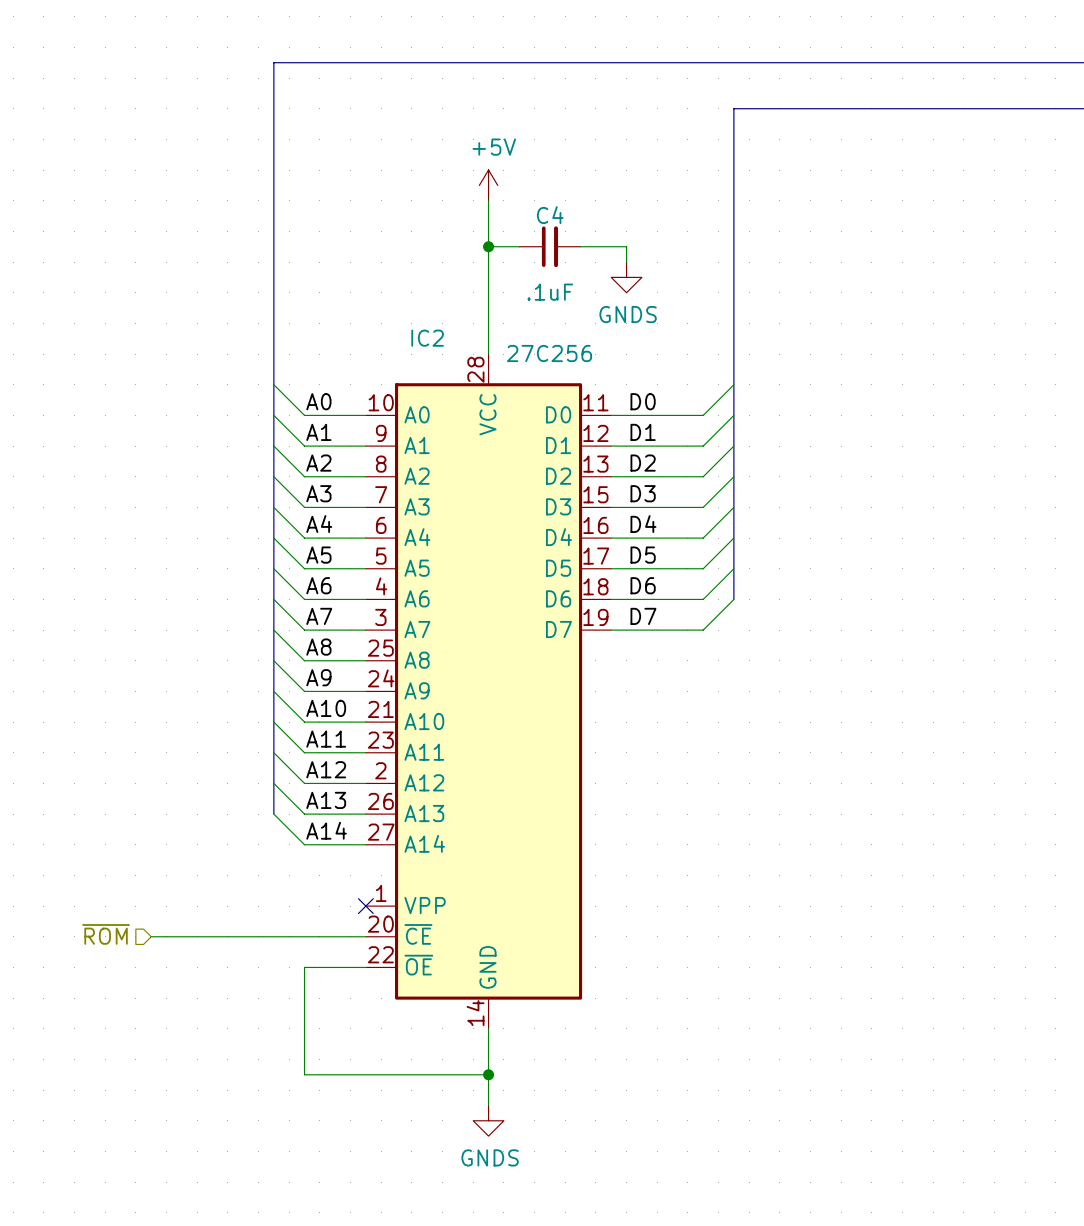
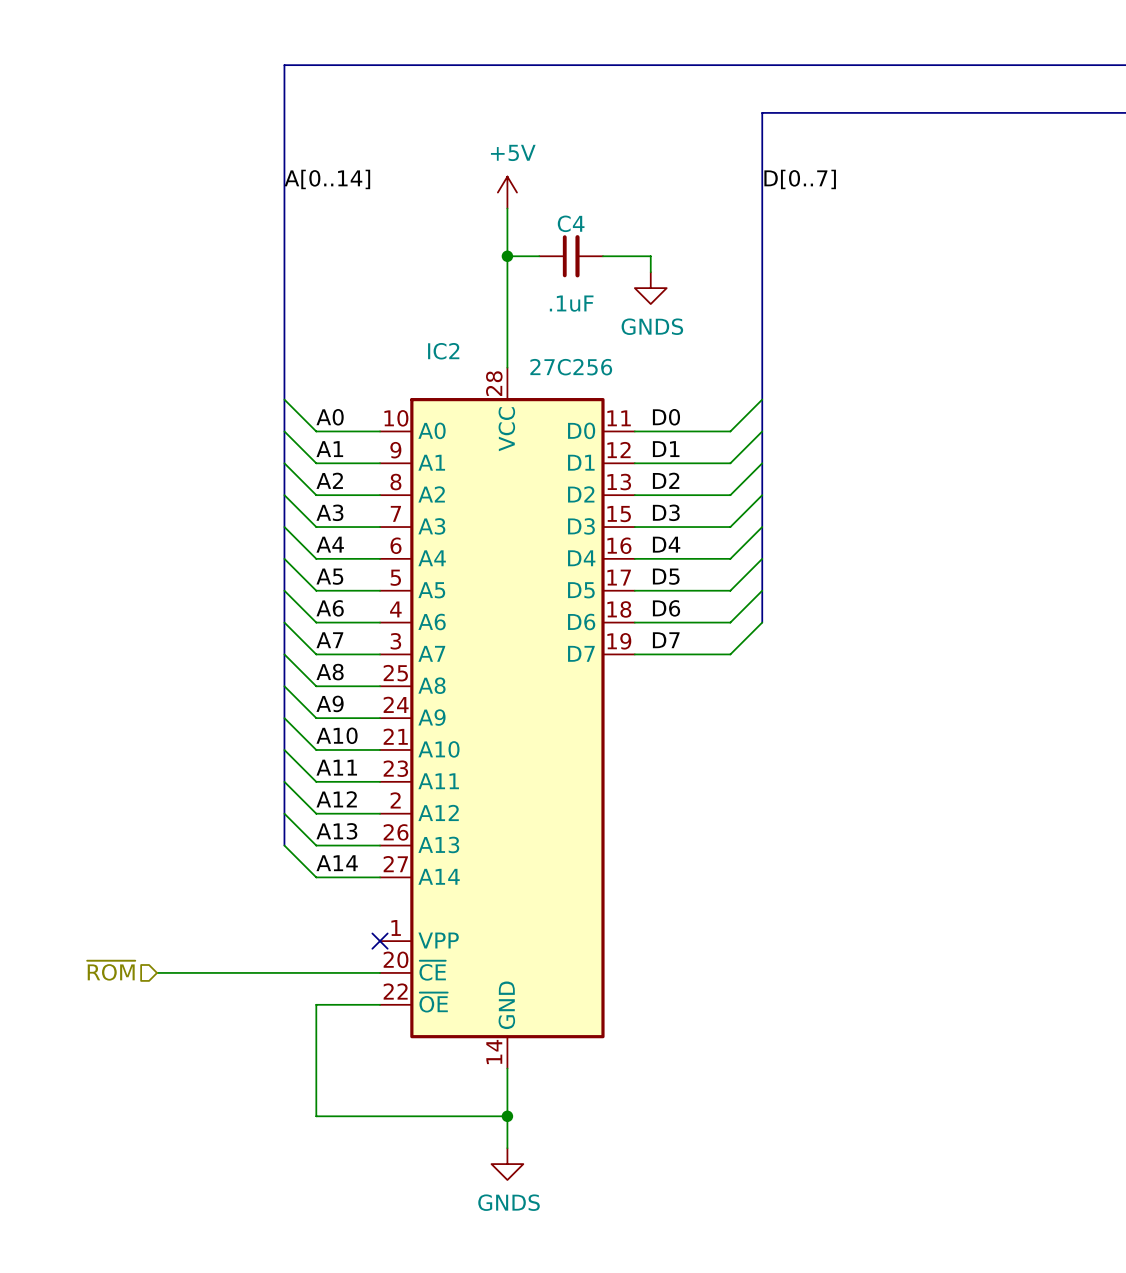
label: none -> A[0..14] (327, 179)
label: none -> D[0..7] (800, 179)

